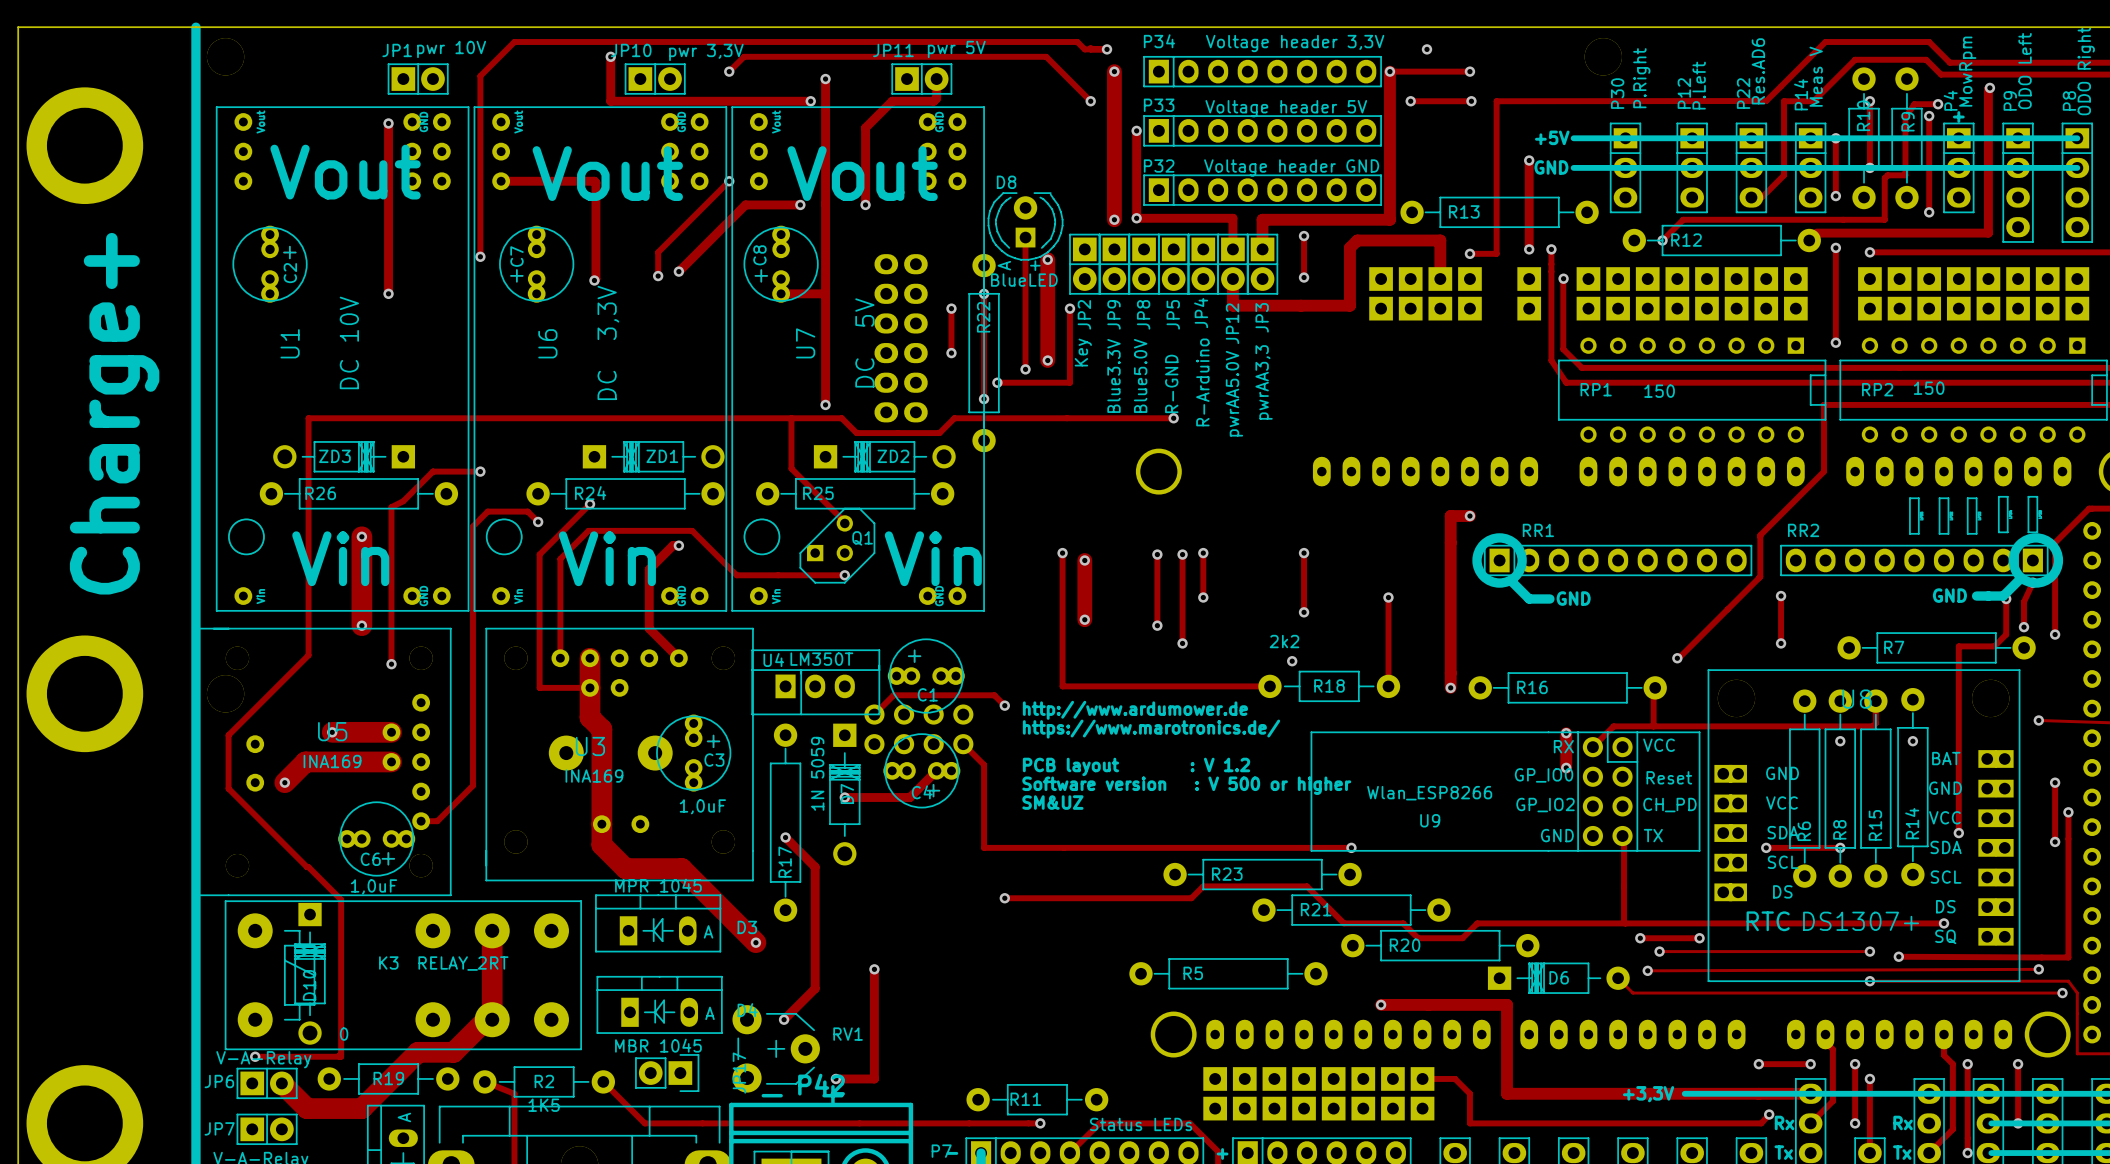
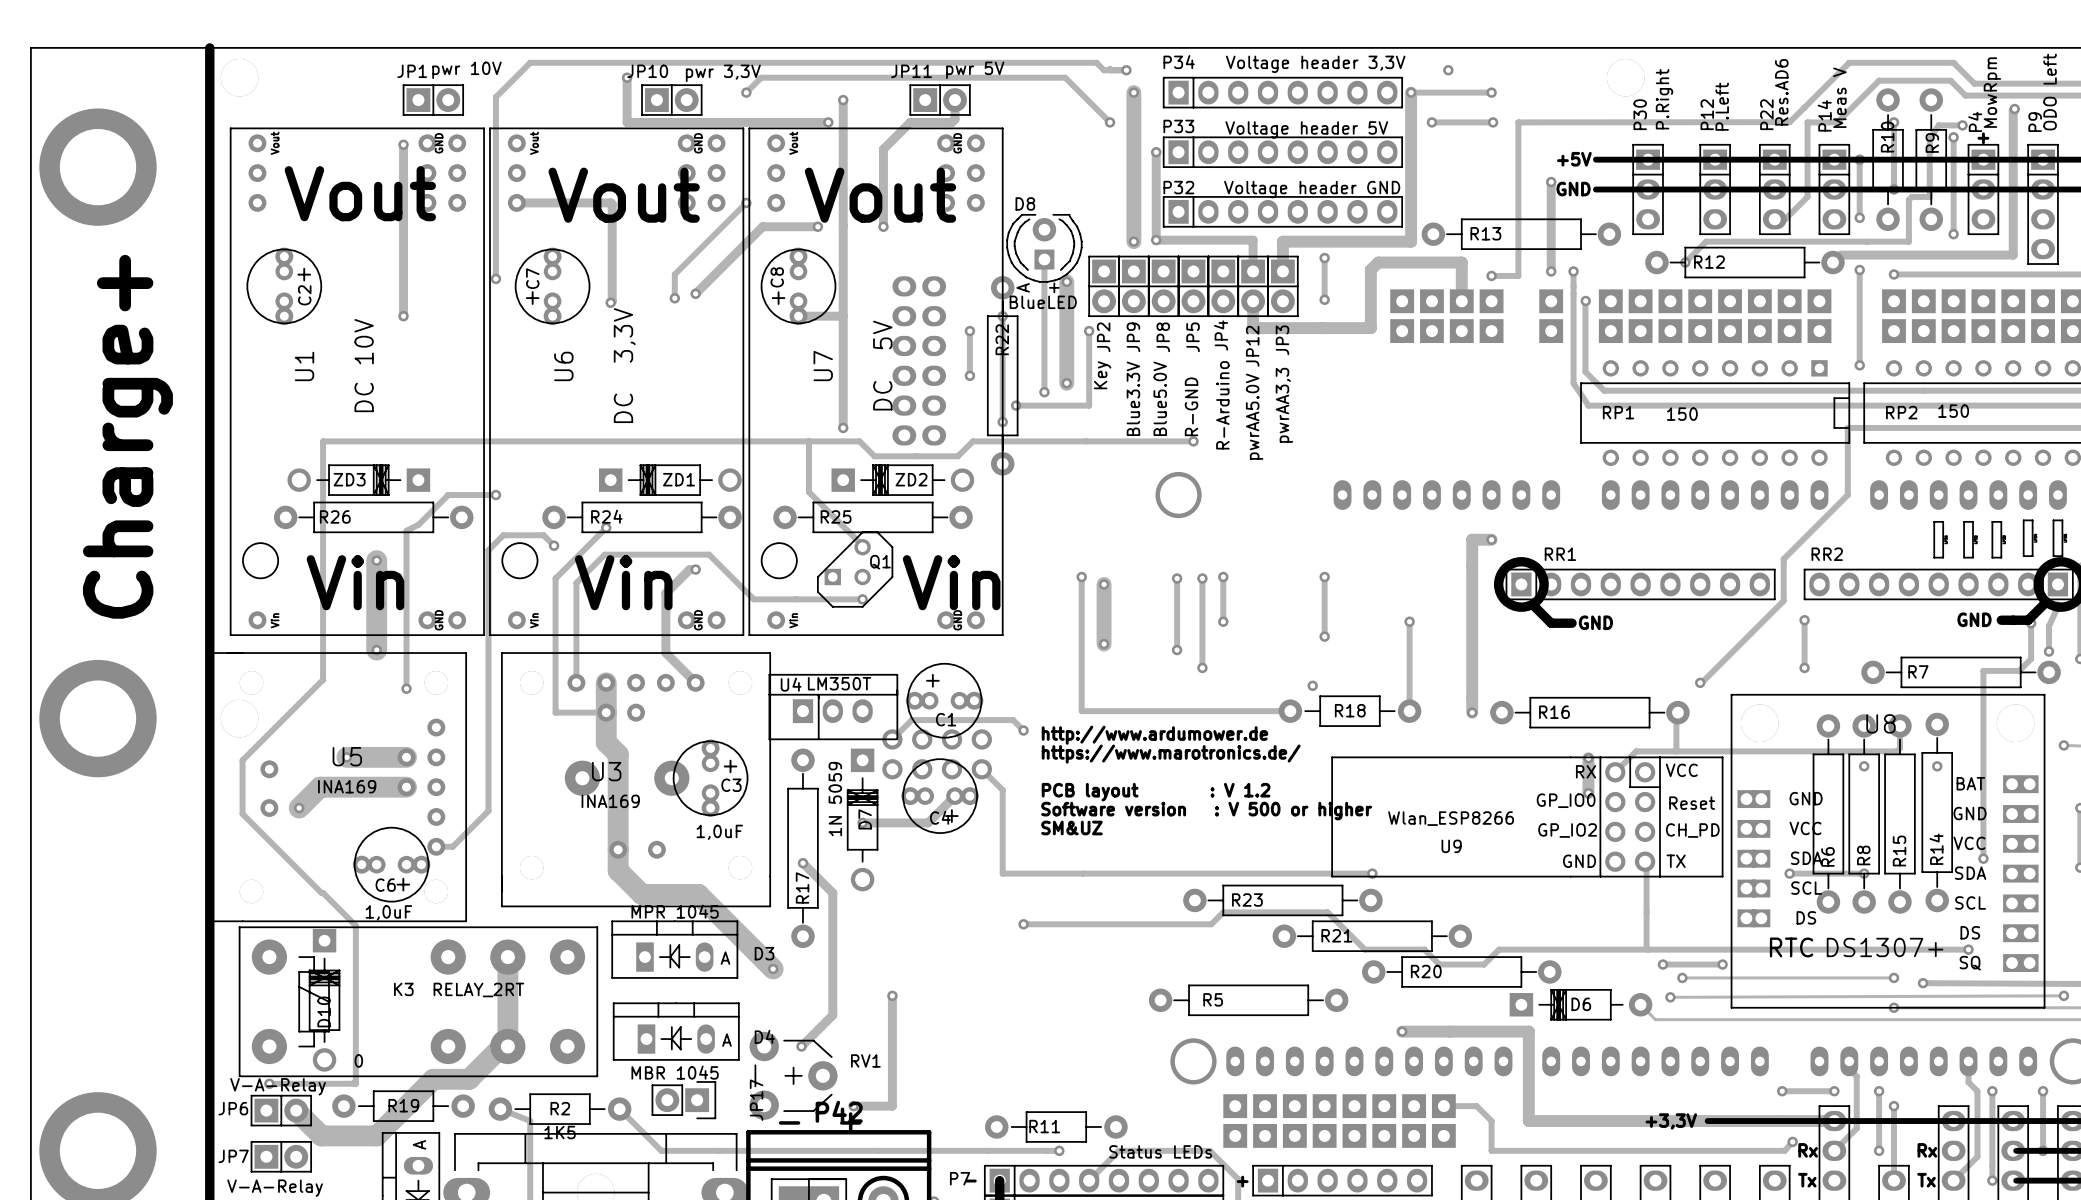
R18 value: 2k2 (1284, 641) -> none

